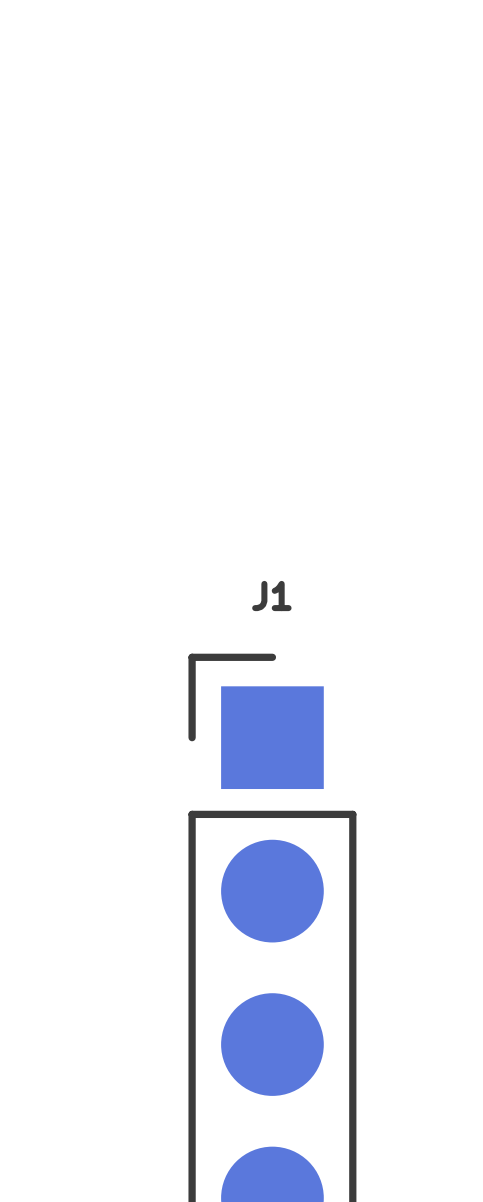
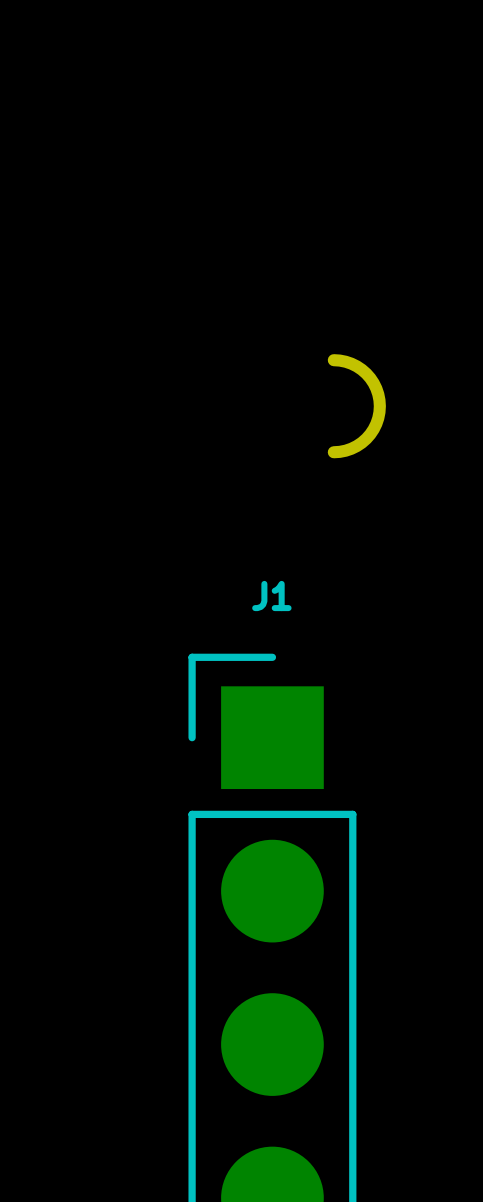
board edge: none -> (333, 360) (351, 363) (366, 373) (376, 388) (379, 406) (376, 423) (366, 438) (351, 448) (333, 452)

